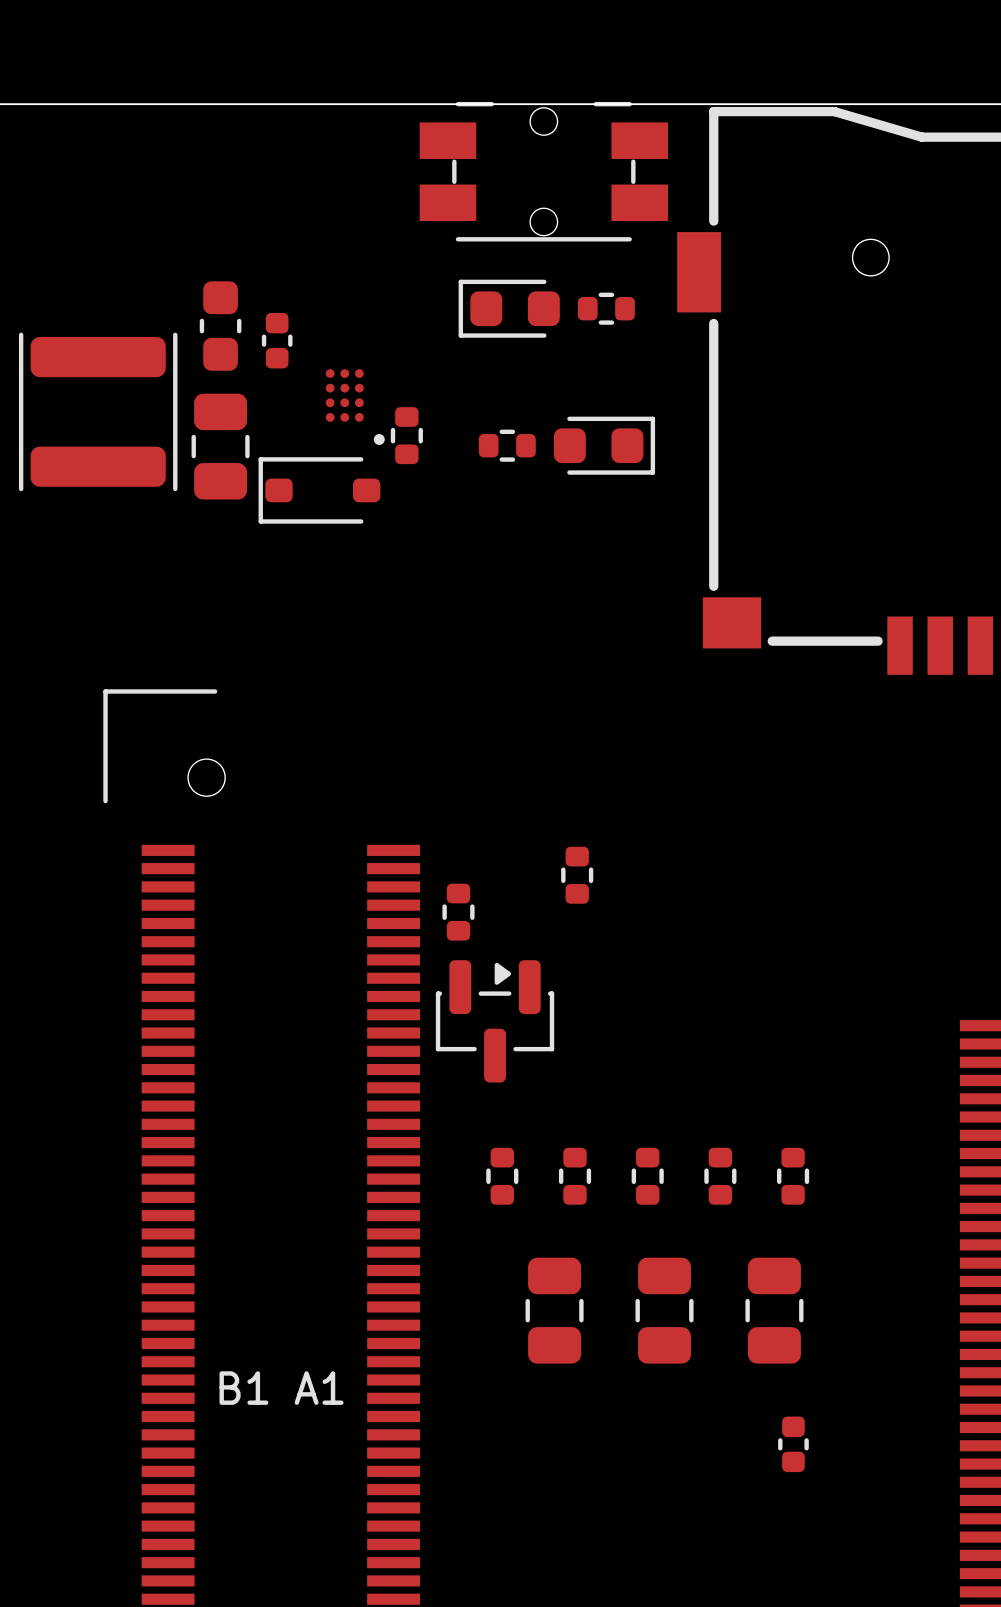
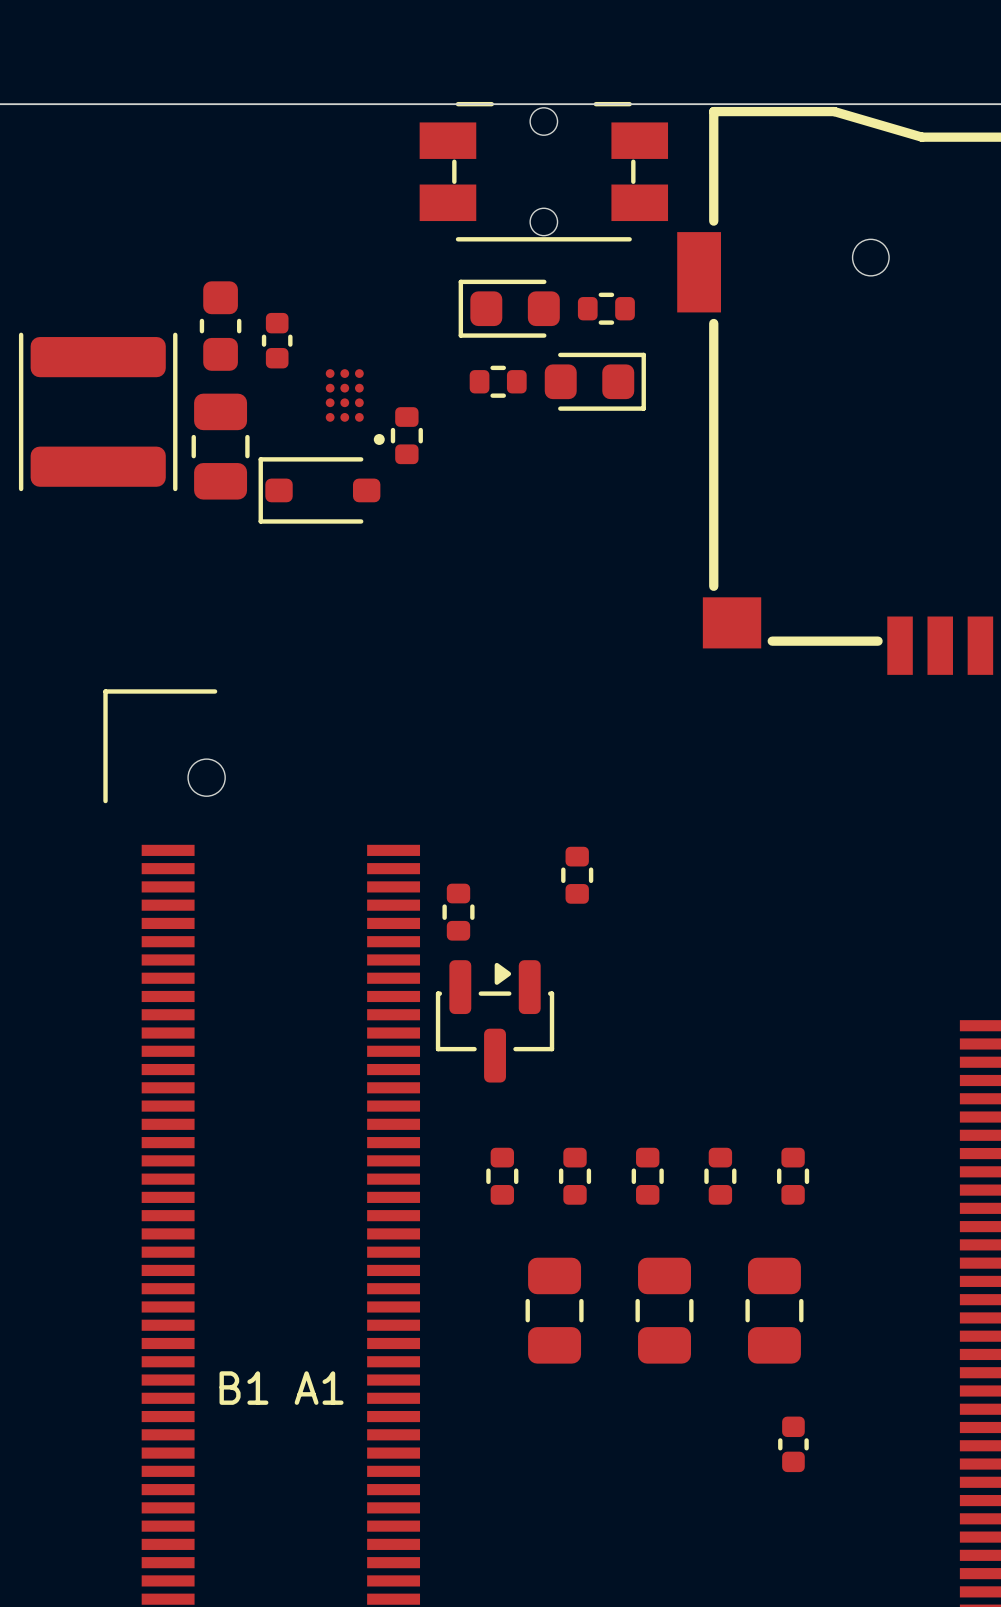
part position: (507, 445) -> (498, 381)
part position: (604, 445) -> (595, 381)

